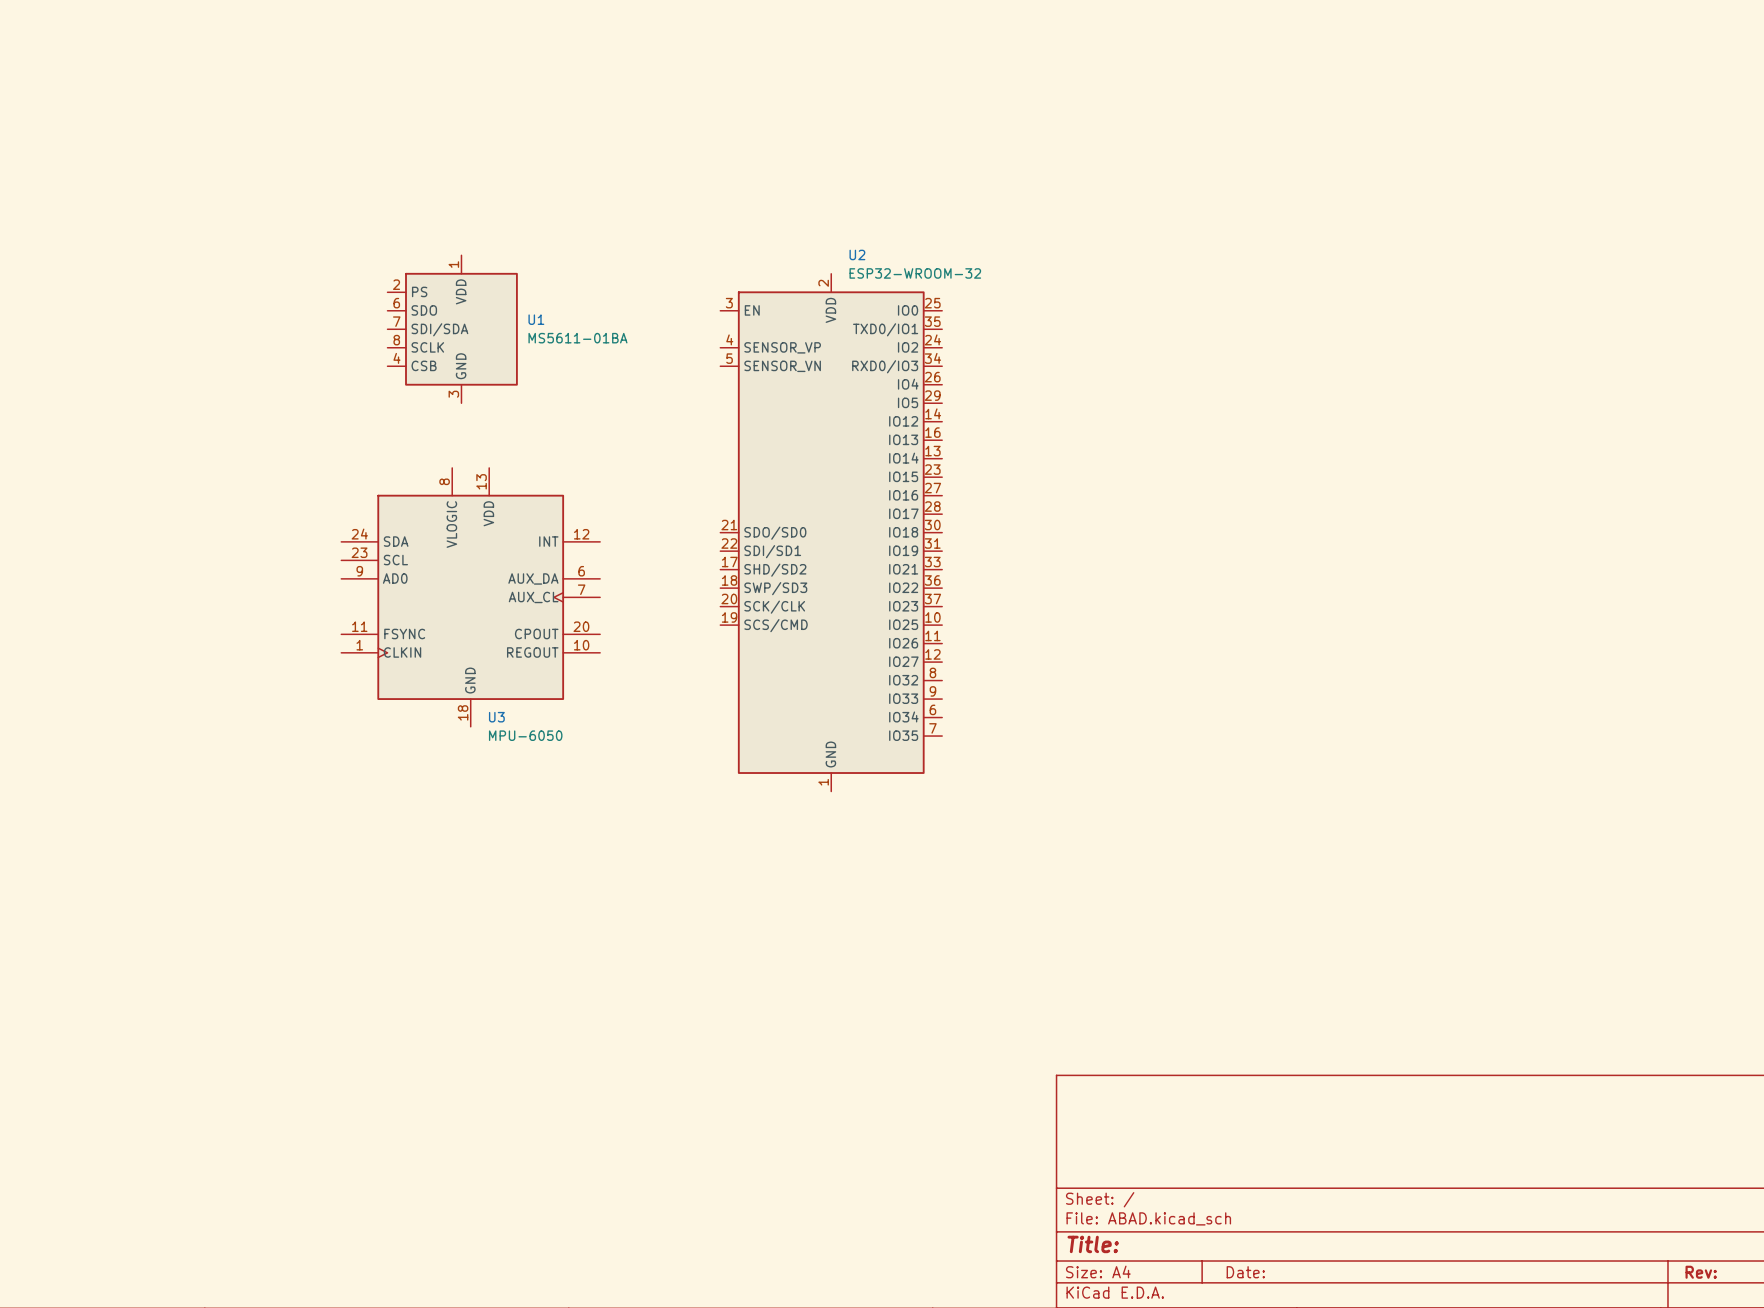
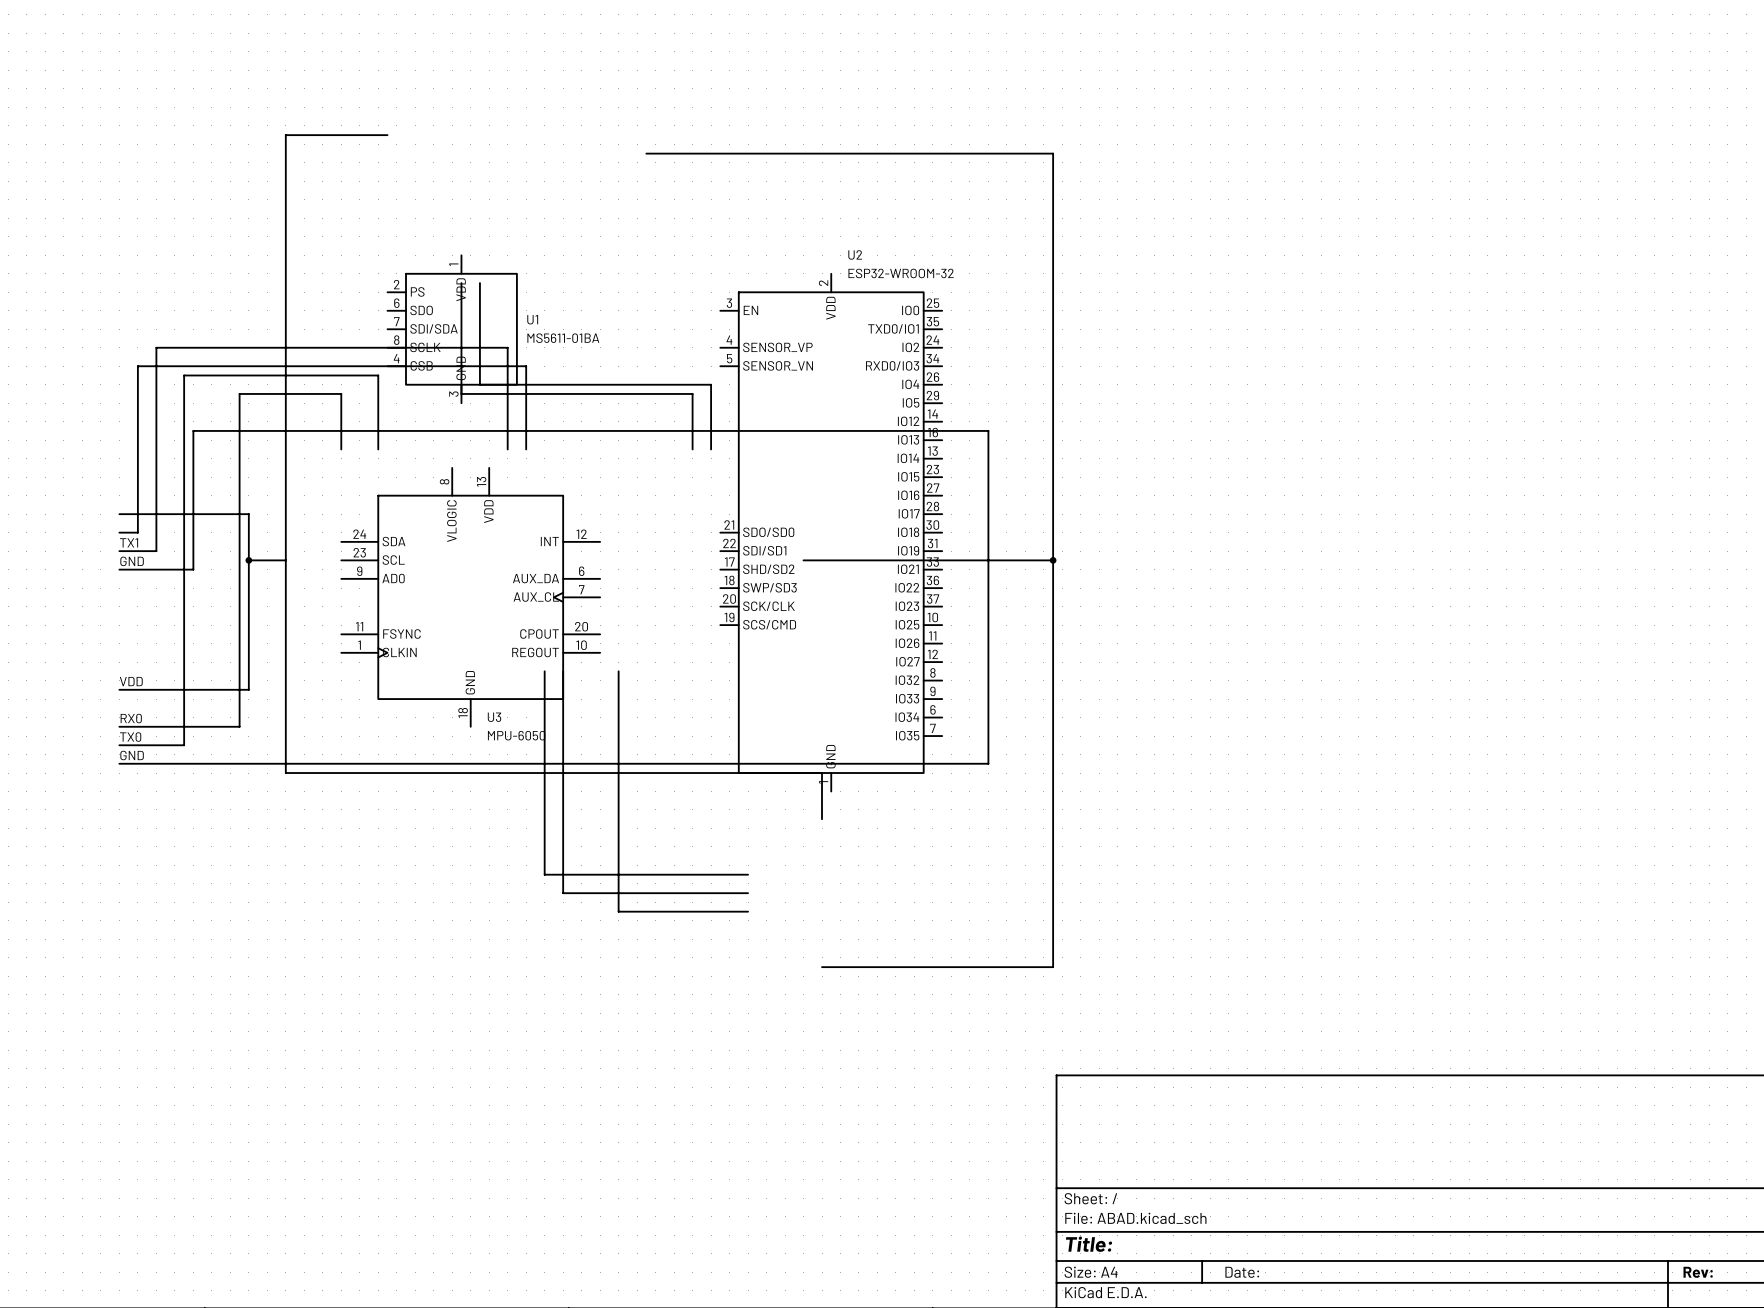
wire: none -> (387, 135) (285, 135) (285, 773) (822, 773) (822, 819)
wire: none -> (646, 153) (1053, 153) (1053, 967) (822, 967)
wire: none -> (461, 283) (461, 393) (692, 393) (692, 449)
wire: none -> (479, 283) (479, 384) (711, 384) (711, 449)
wire: none -> (341, 449) (341, 393) (239, 393) (239, 726) (119, 726)
wire: none -> (378, 449) (378, 375) (184, 375) (184, 745) (119, 745)
wire: none -> (507, 449) (507, 347) (156, 347) (156, 551) (119, 551)
wire: none -> (526, 449) (526, 366) (137, 366) (137, 532) (119, 532)
wire: none -> (119, 514) (248, 514) (248, 689) (119, 689)
label: none -> TX1 (129, 542)
wire: none -> (248, 560) (285, 560)
junction: none -> (248, 560)
wire: none -> (803, 560) (1053, 560)
junction: none -> (1053, 560)
label: none -> GND (132, 561)
wire: none -> (119, 569) (193, 569) (193, 430) (988, 430) (988, 763) (119, 763)
wire: none -> (544, 671) (544, 874) (748, 874)
wire: none -> (563, 671) (563, 893) (748, 893)
wire: none -> (618, 671) (618, 911) (748, 911)
label: none -> VDD (131, 681)
label: none -> RX0 (131, 718)
label: none -> TX0 (130, 737)
label: none -> GND (132, 755)

